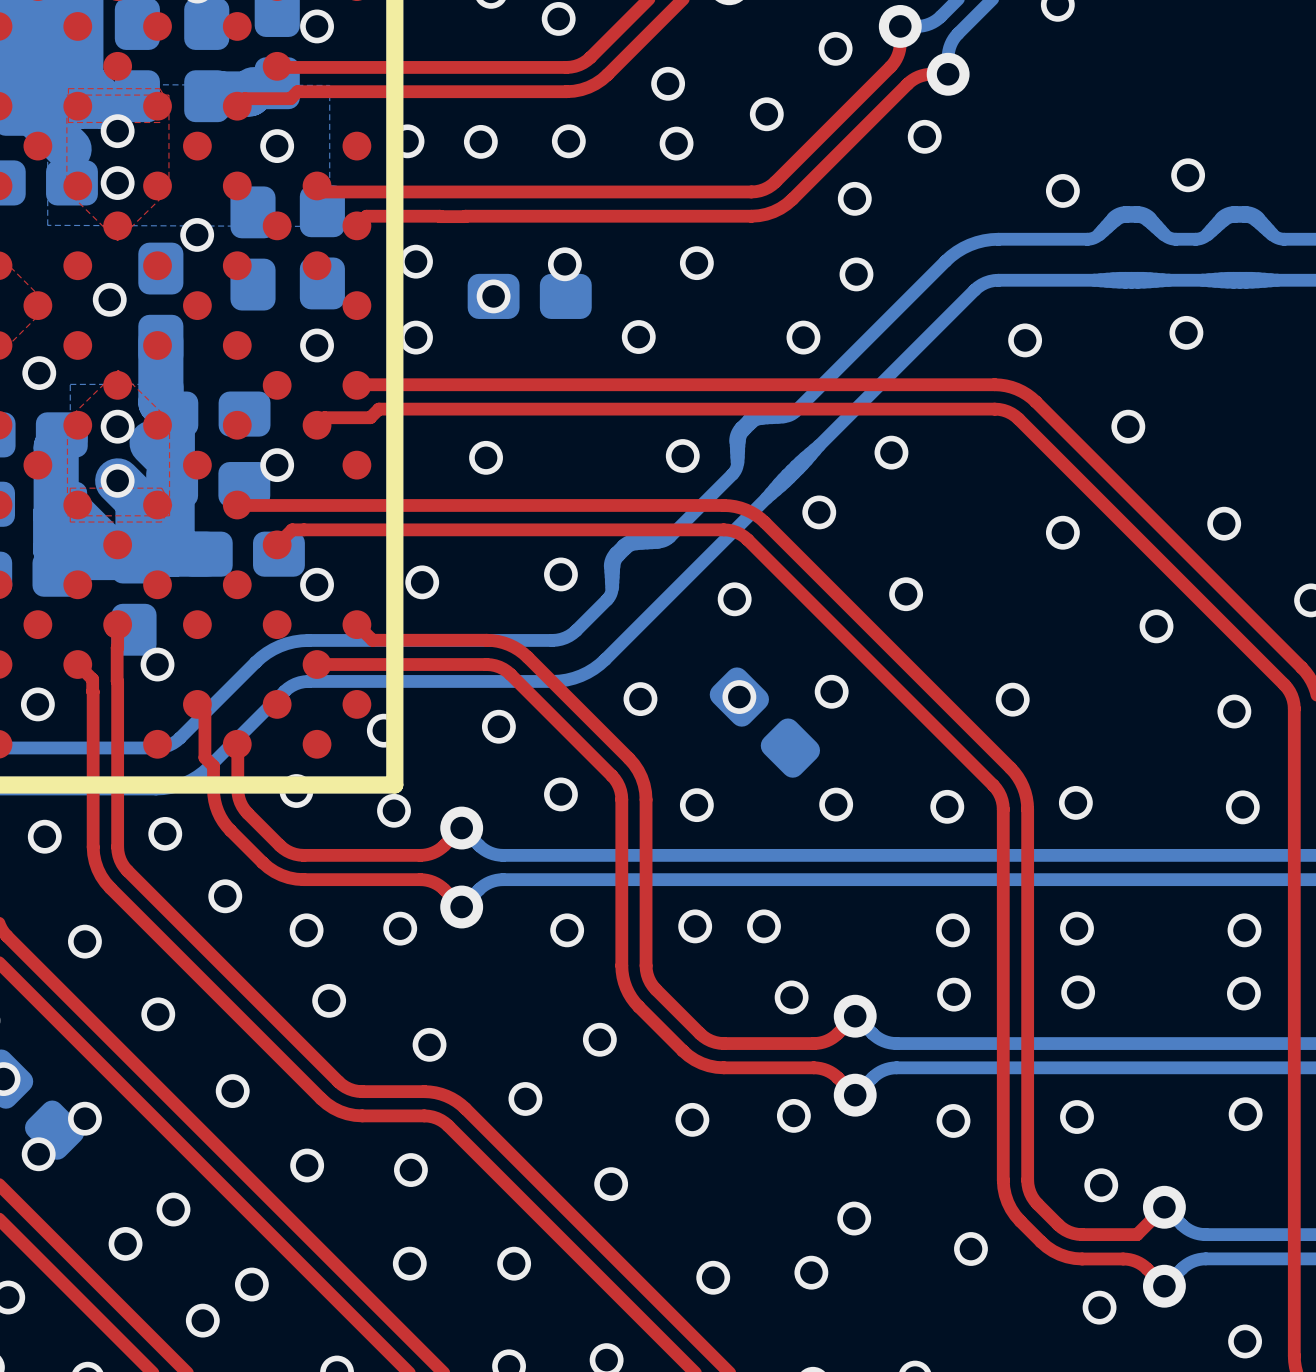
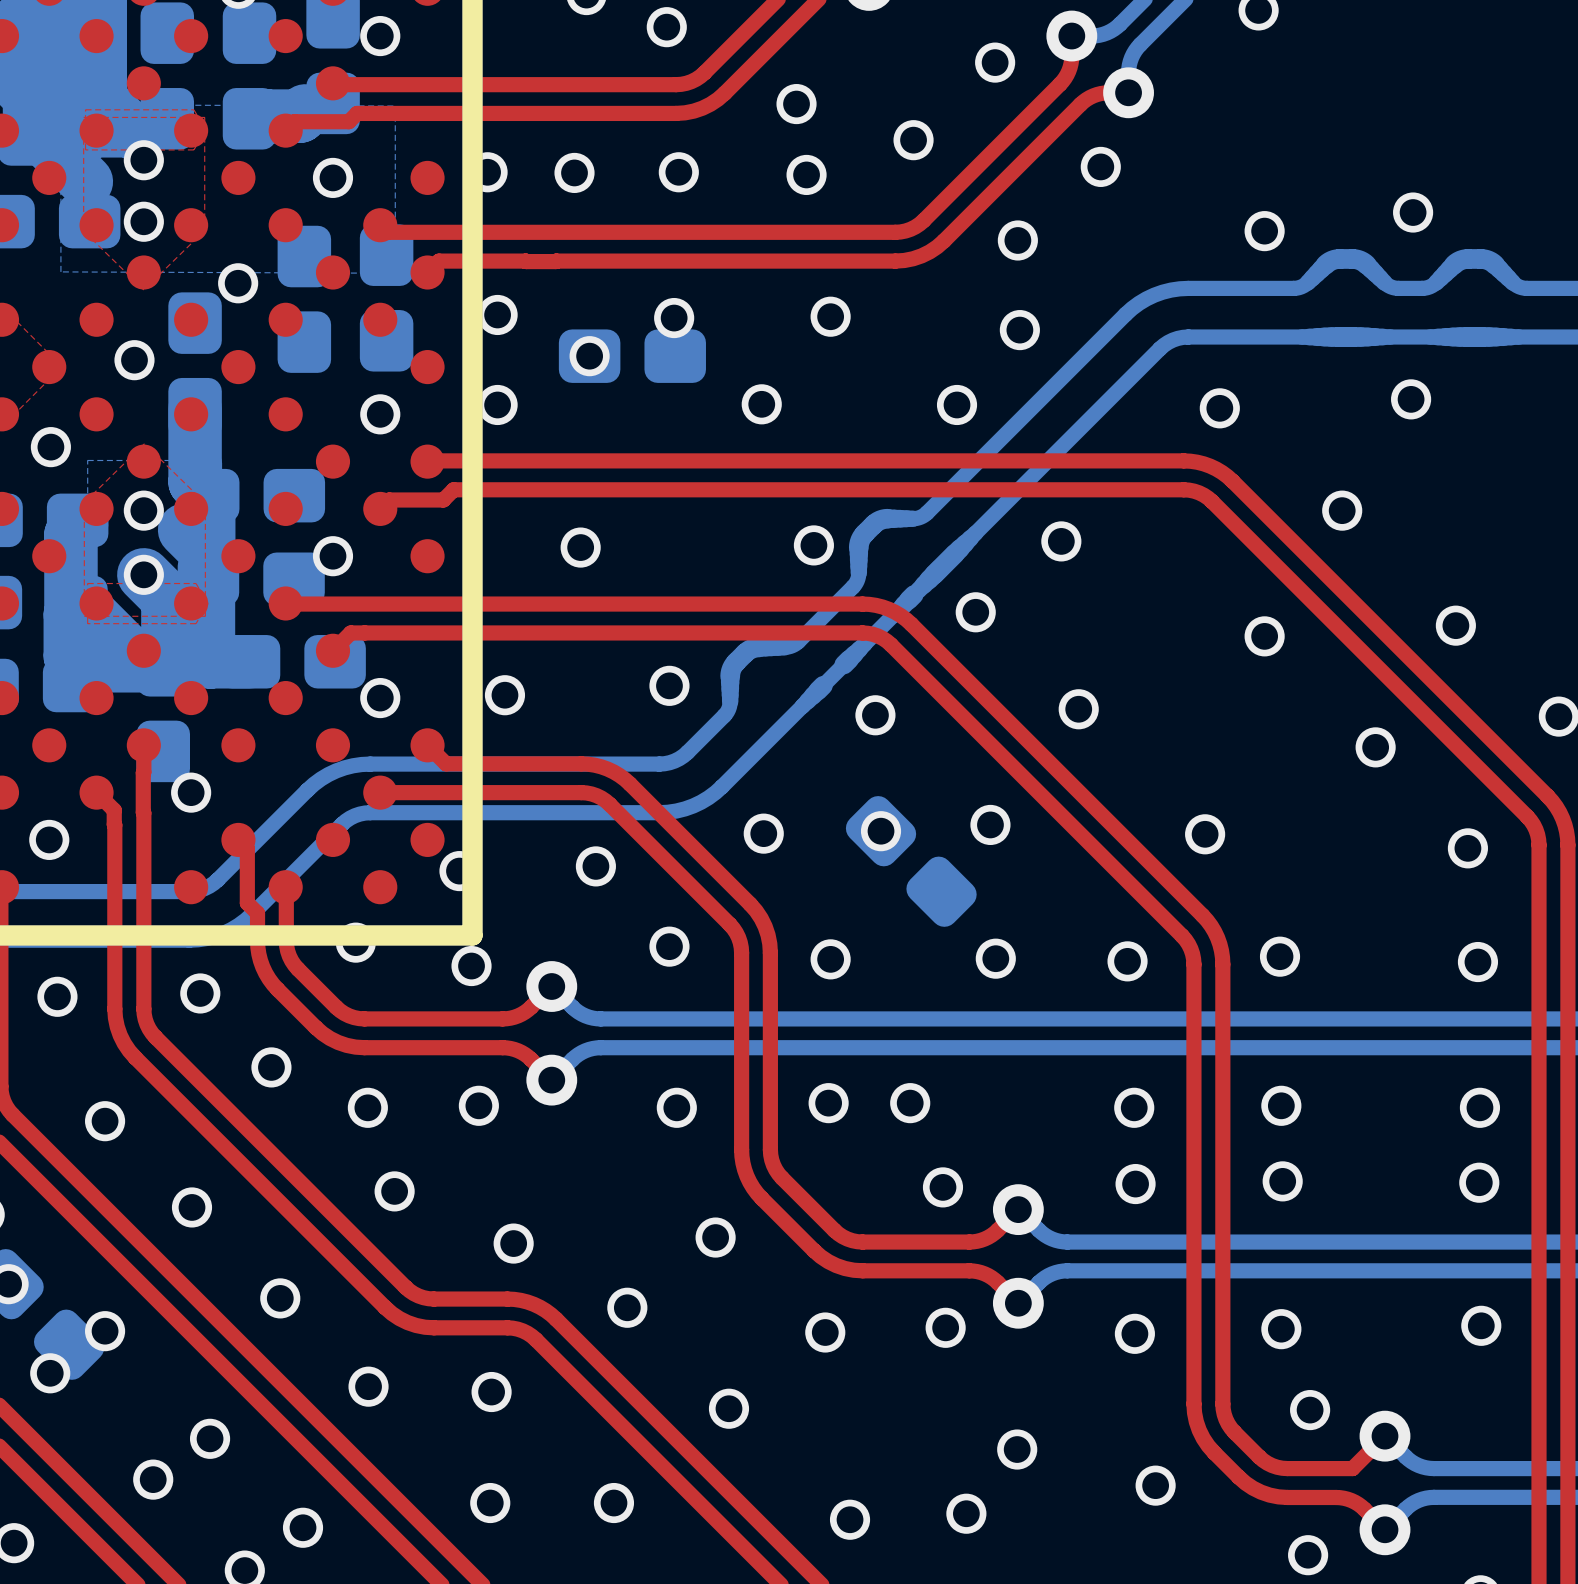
bottom track: (795, 411) (785, 416) (757, 417) (742, 429) (737, 437) (736, 468) (715, 491) -> (947, 492) (922, 516) (914, 518) (882, 519) (875, 522) (864, 533) (858, 545) (858, 576) (852, 587)

